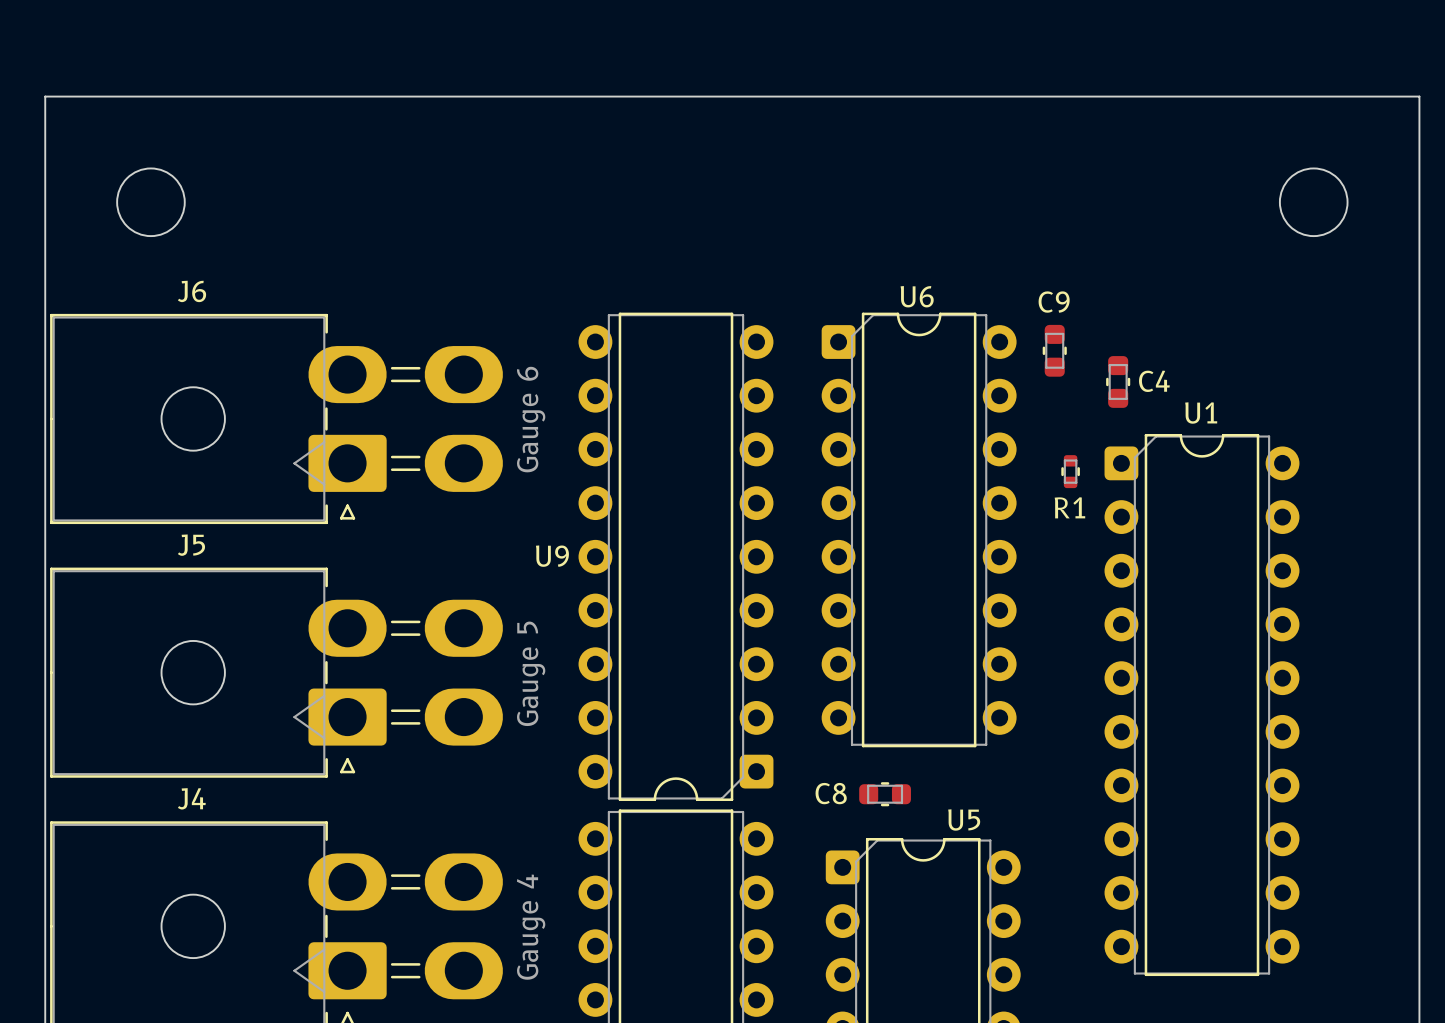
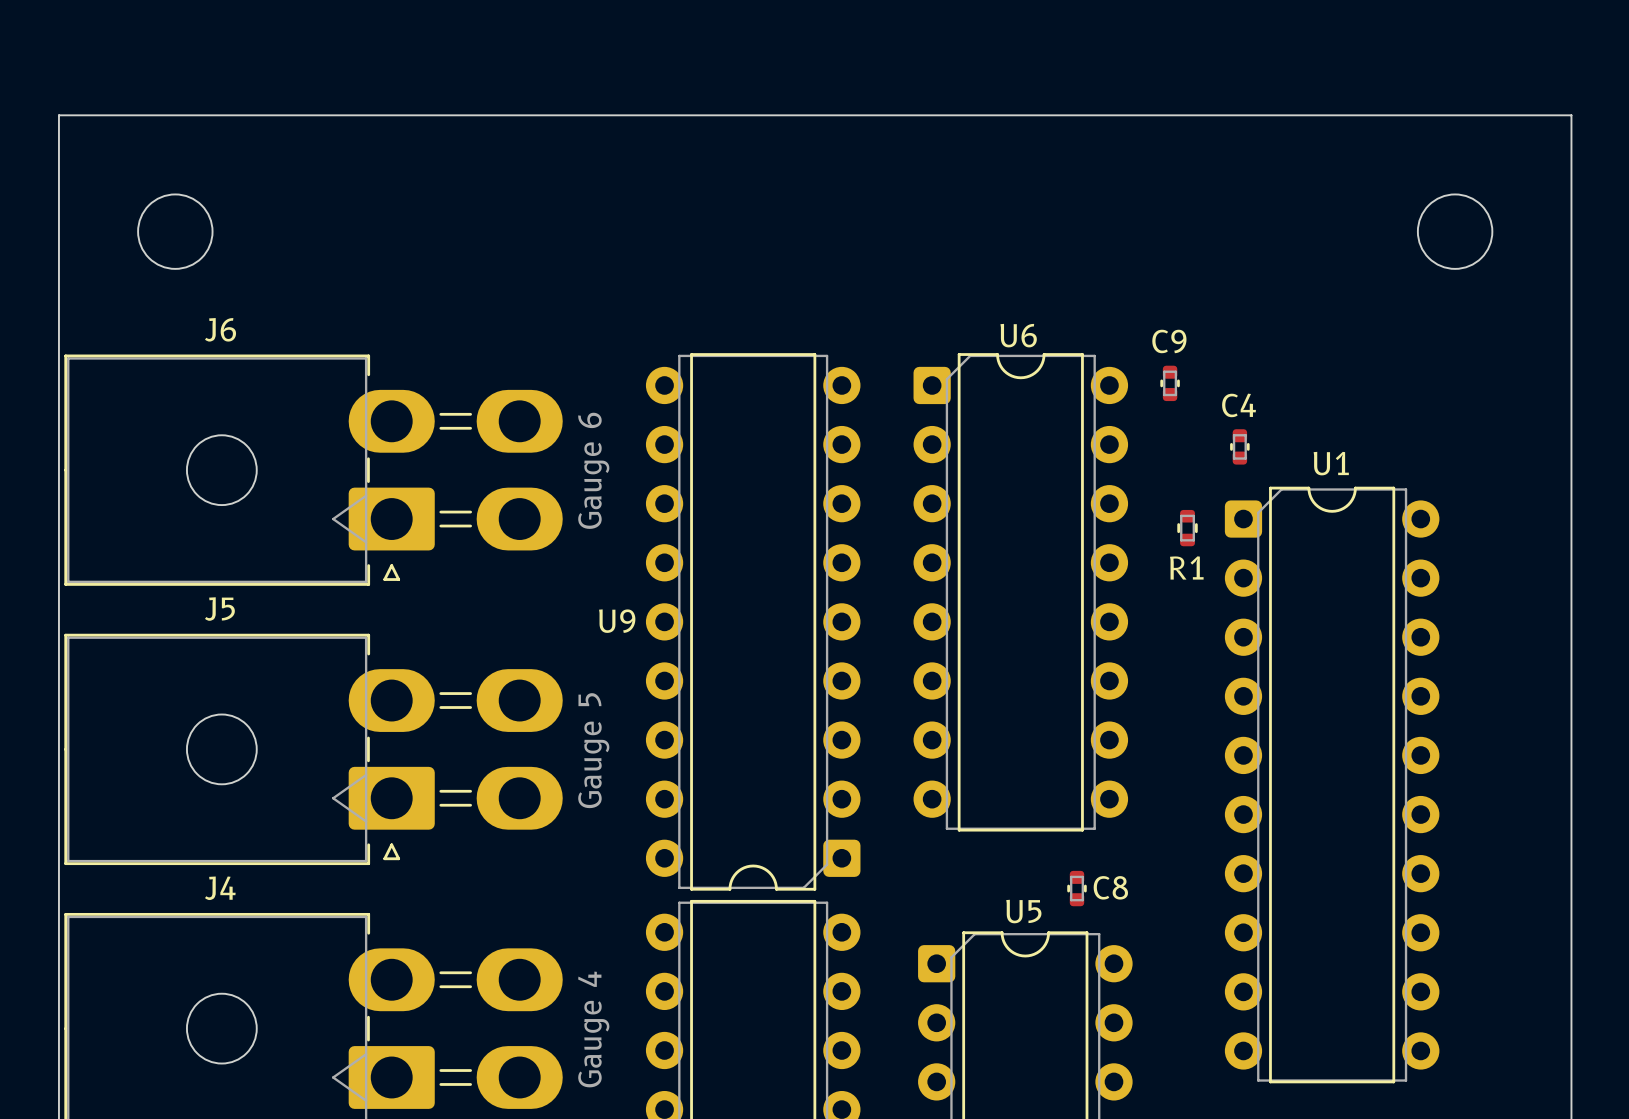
C9 footprint: [1042, 324, 1067, 377] -> [1160, 365, 1180, 402]
C4 footprint: [1106, 356, 1131, 408] -> [1230, 429, 1250, 465]
C4 name position: C4 (1154, 381) -> C4 (1239, 405)
C8 footprint: [859, 782, 911, 807] -> [1067, 870, 1087, 907]
C8 name position: C8 (831, 793) -> C8 (1110, 887)
U5 name position: U5 (964, 819) -> U5 (1023, 911)

